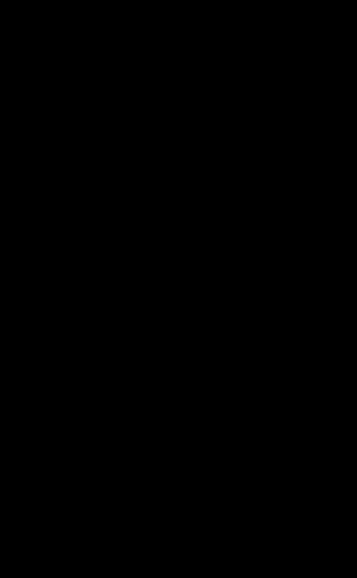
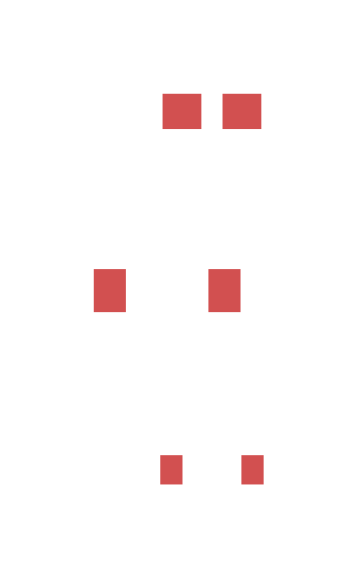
part: none -> (211, 111)
part: none -> (167, 290)
part: none -> (211, 469)

